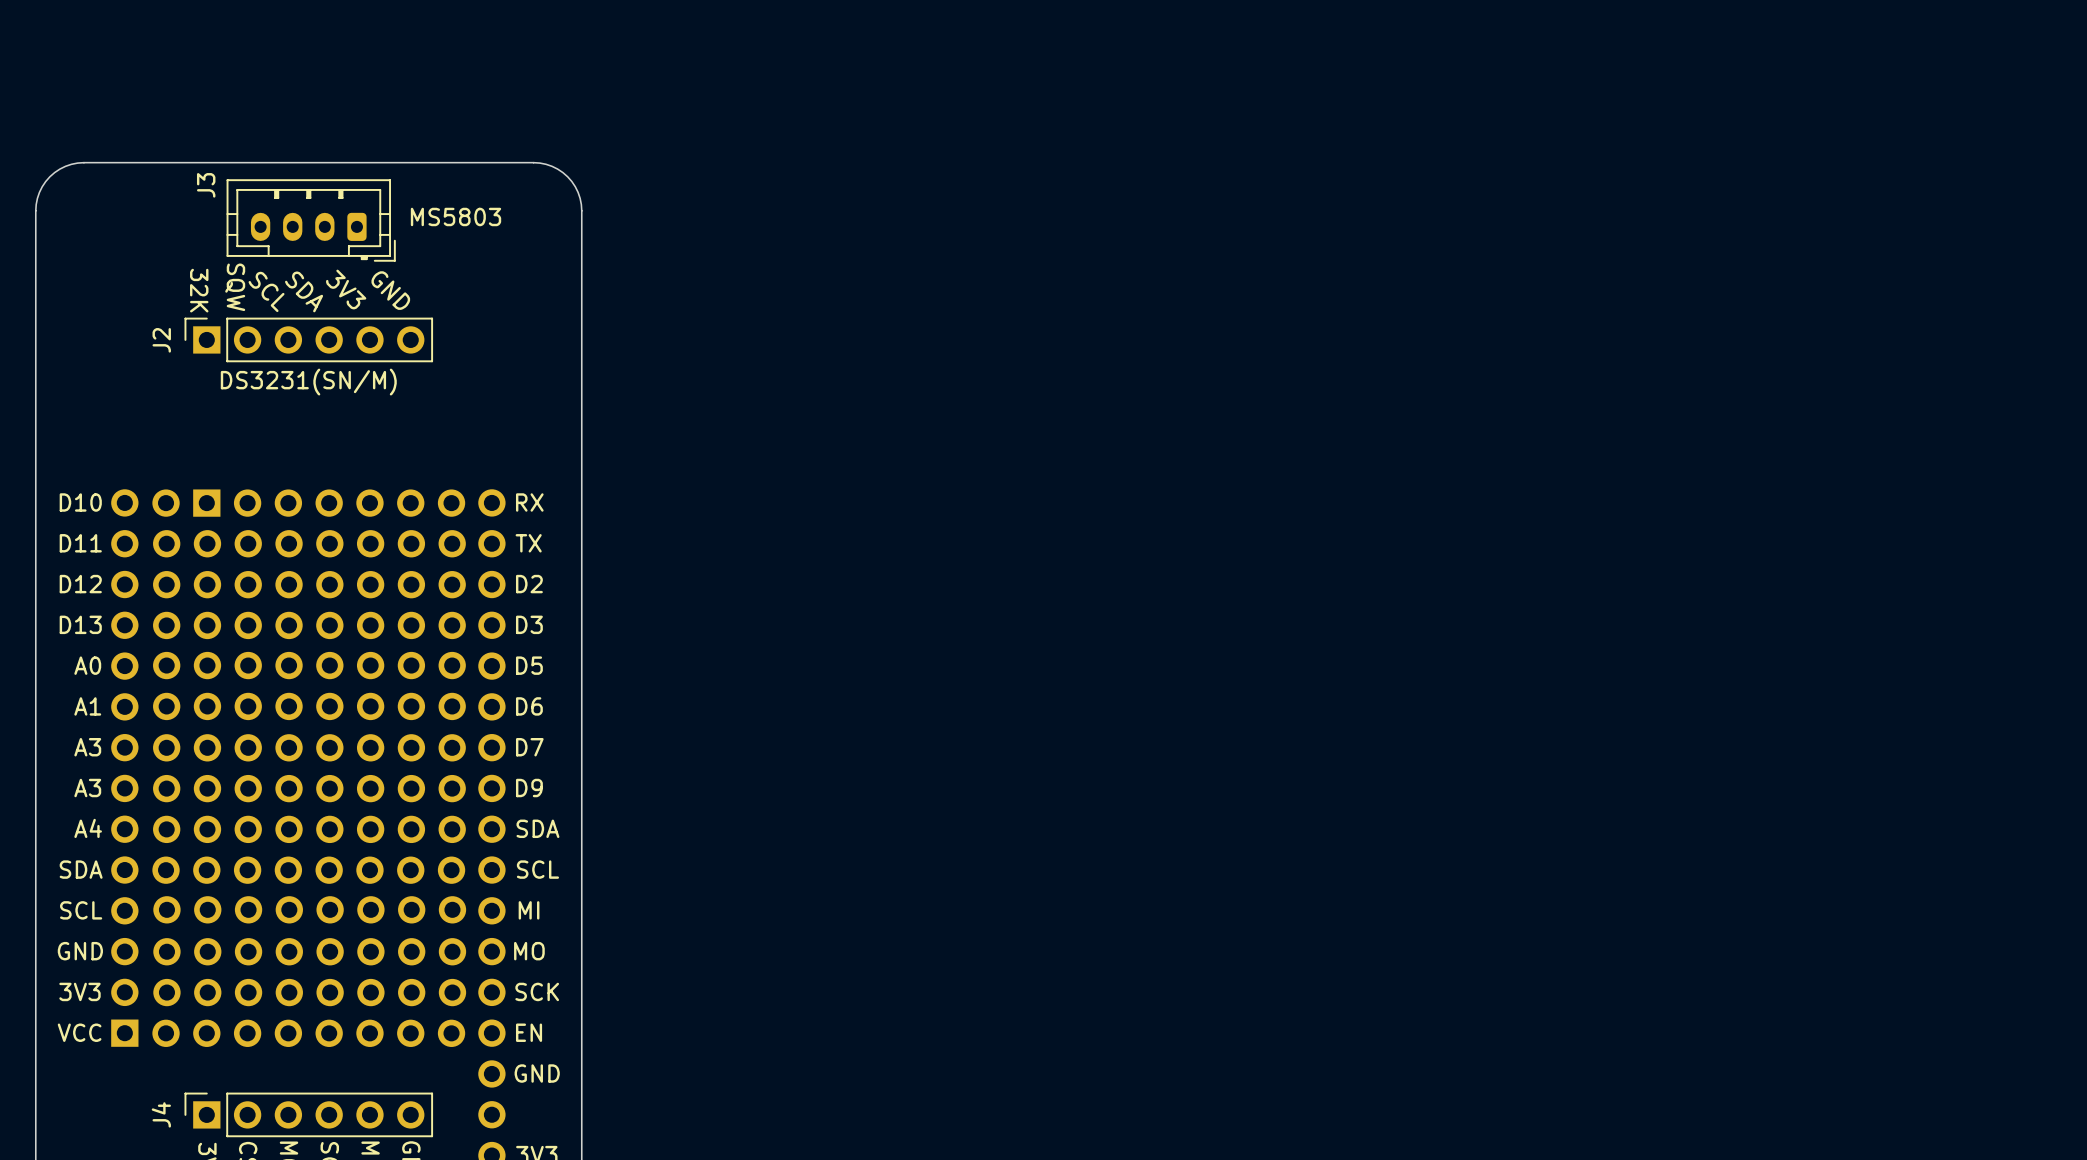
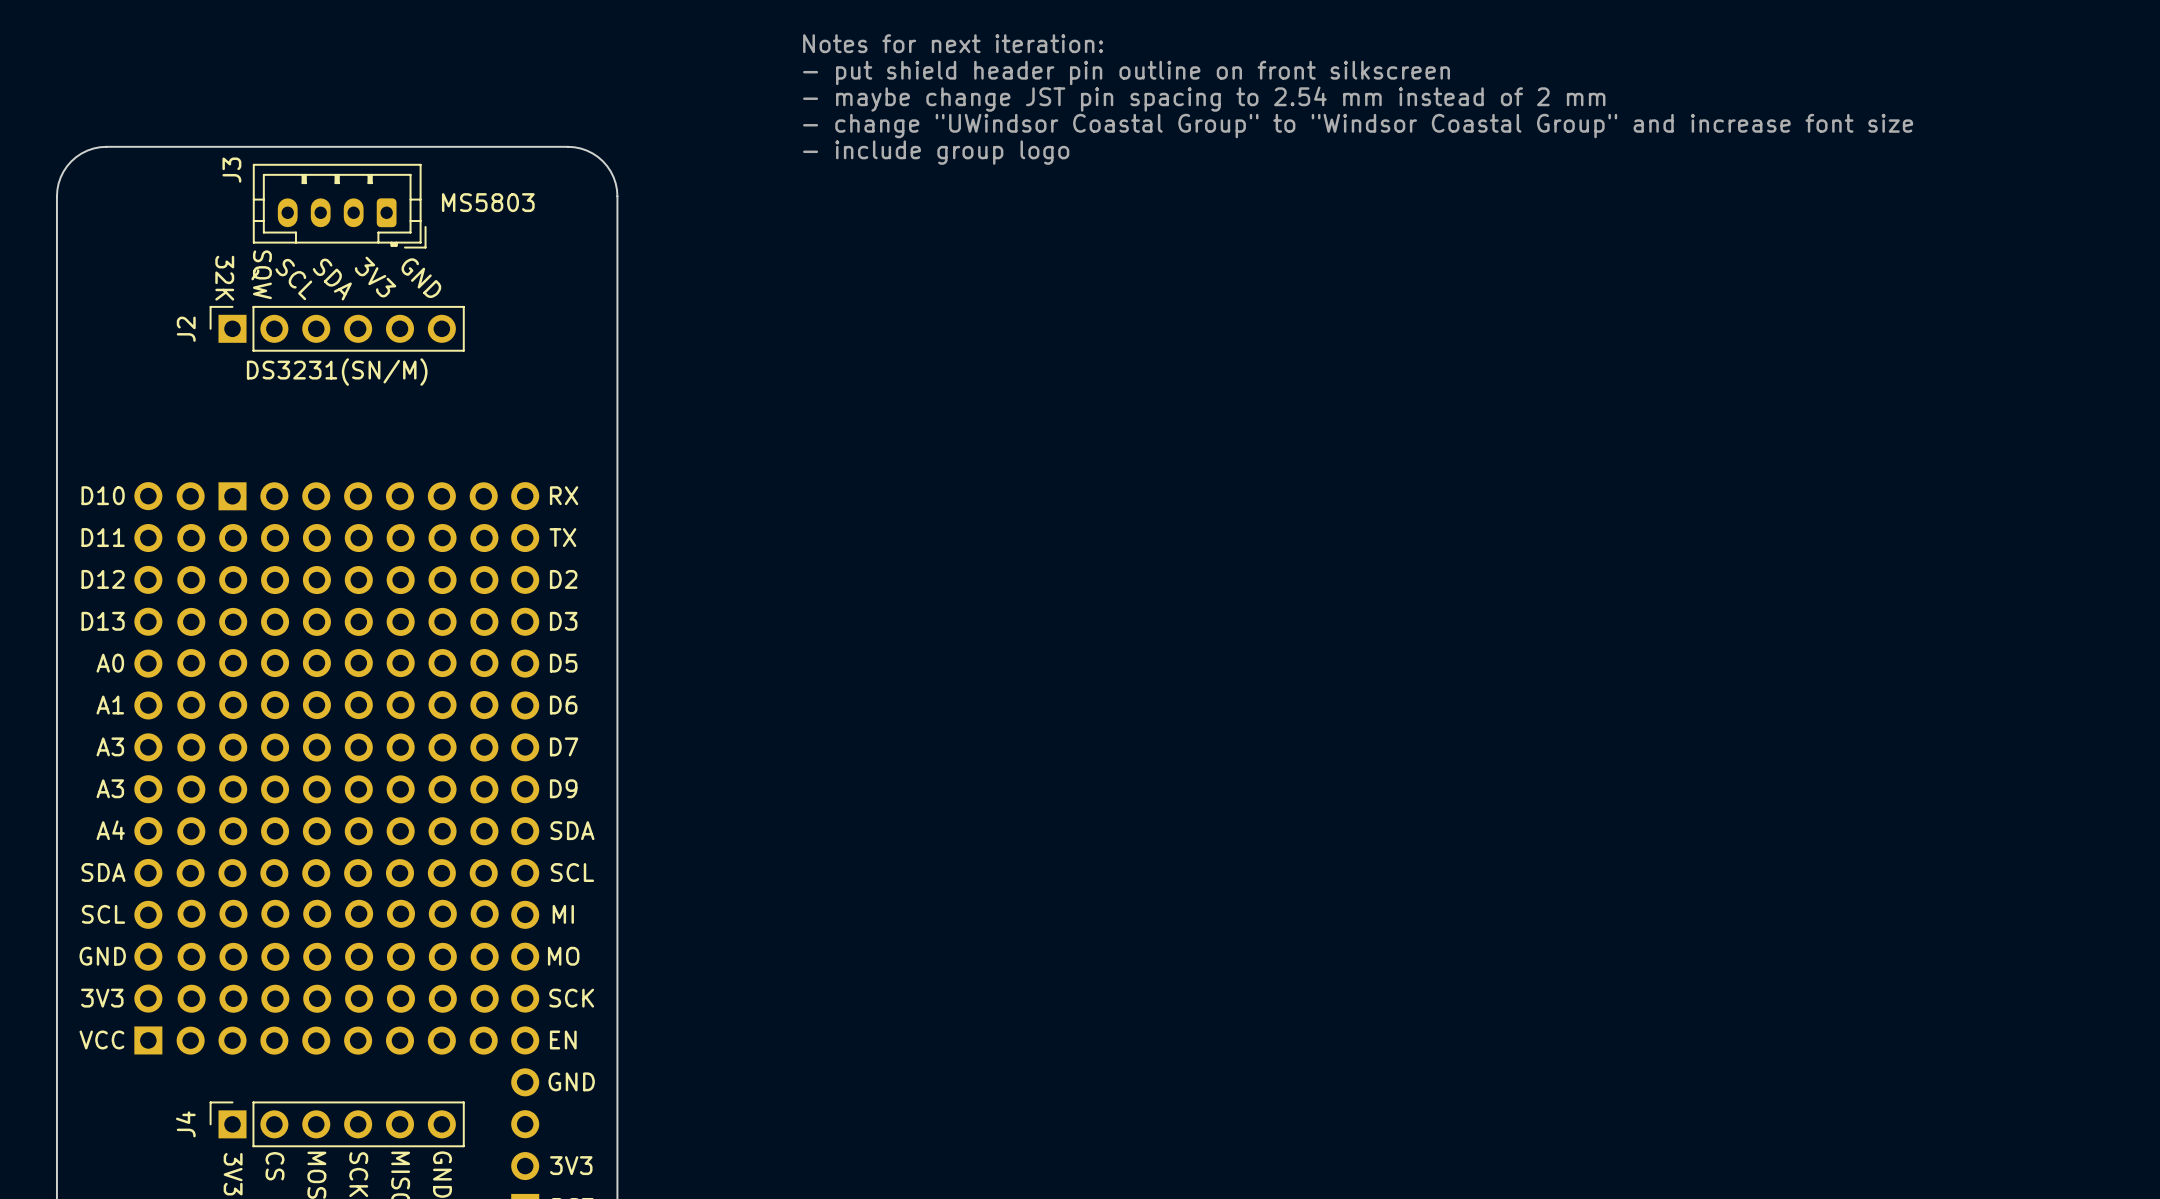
text: none -> Notes for next iteration: (953, 43)
text: none -> - put shield header pin outline on front silkscreen (1126, 72)
text: none -> - maybe change JST pin spacing to 2.54 mm instead of 2 mm (1204, 99)
text: none -> - change "UWindsor Coastal Group" to "Windsor Coastal Group" and increase font size (1358, 126)
text: none -> - include group logo (936, 152)

